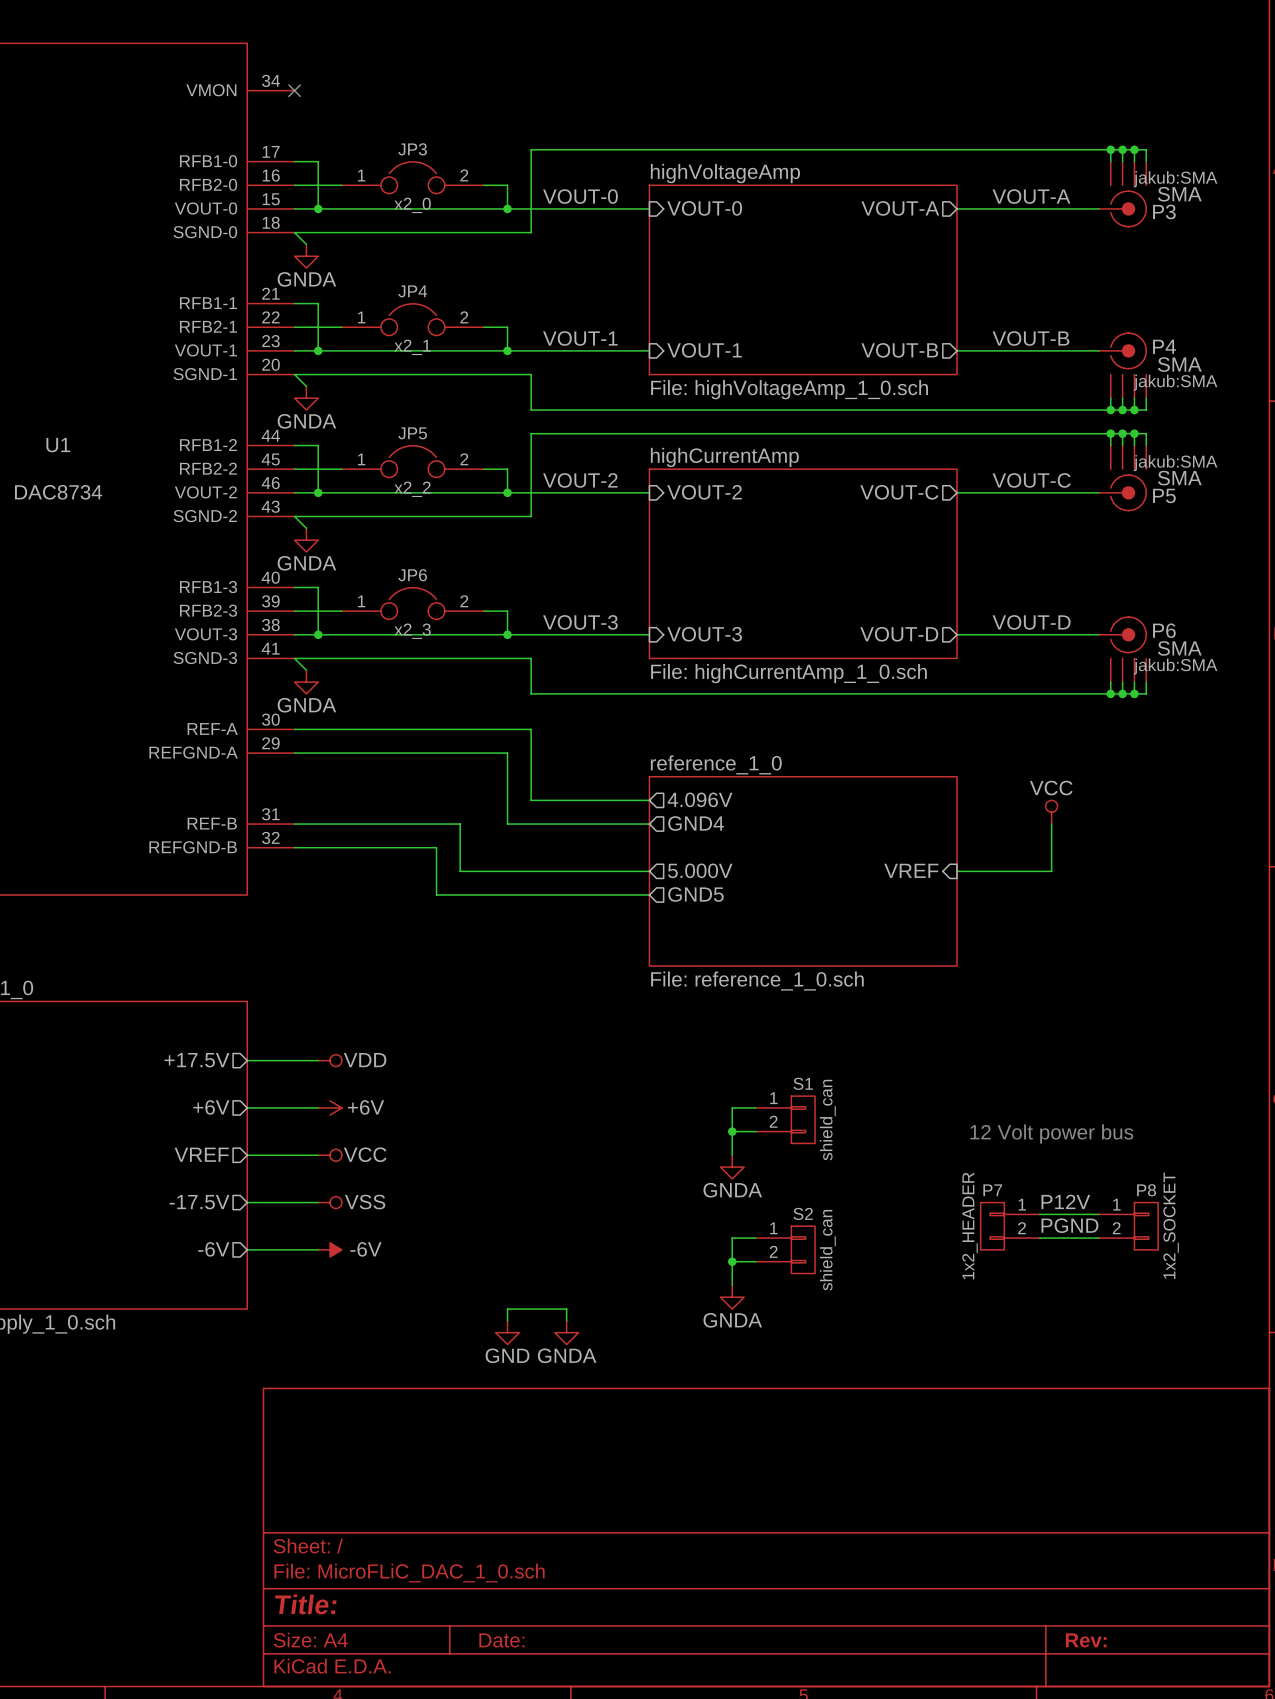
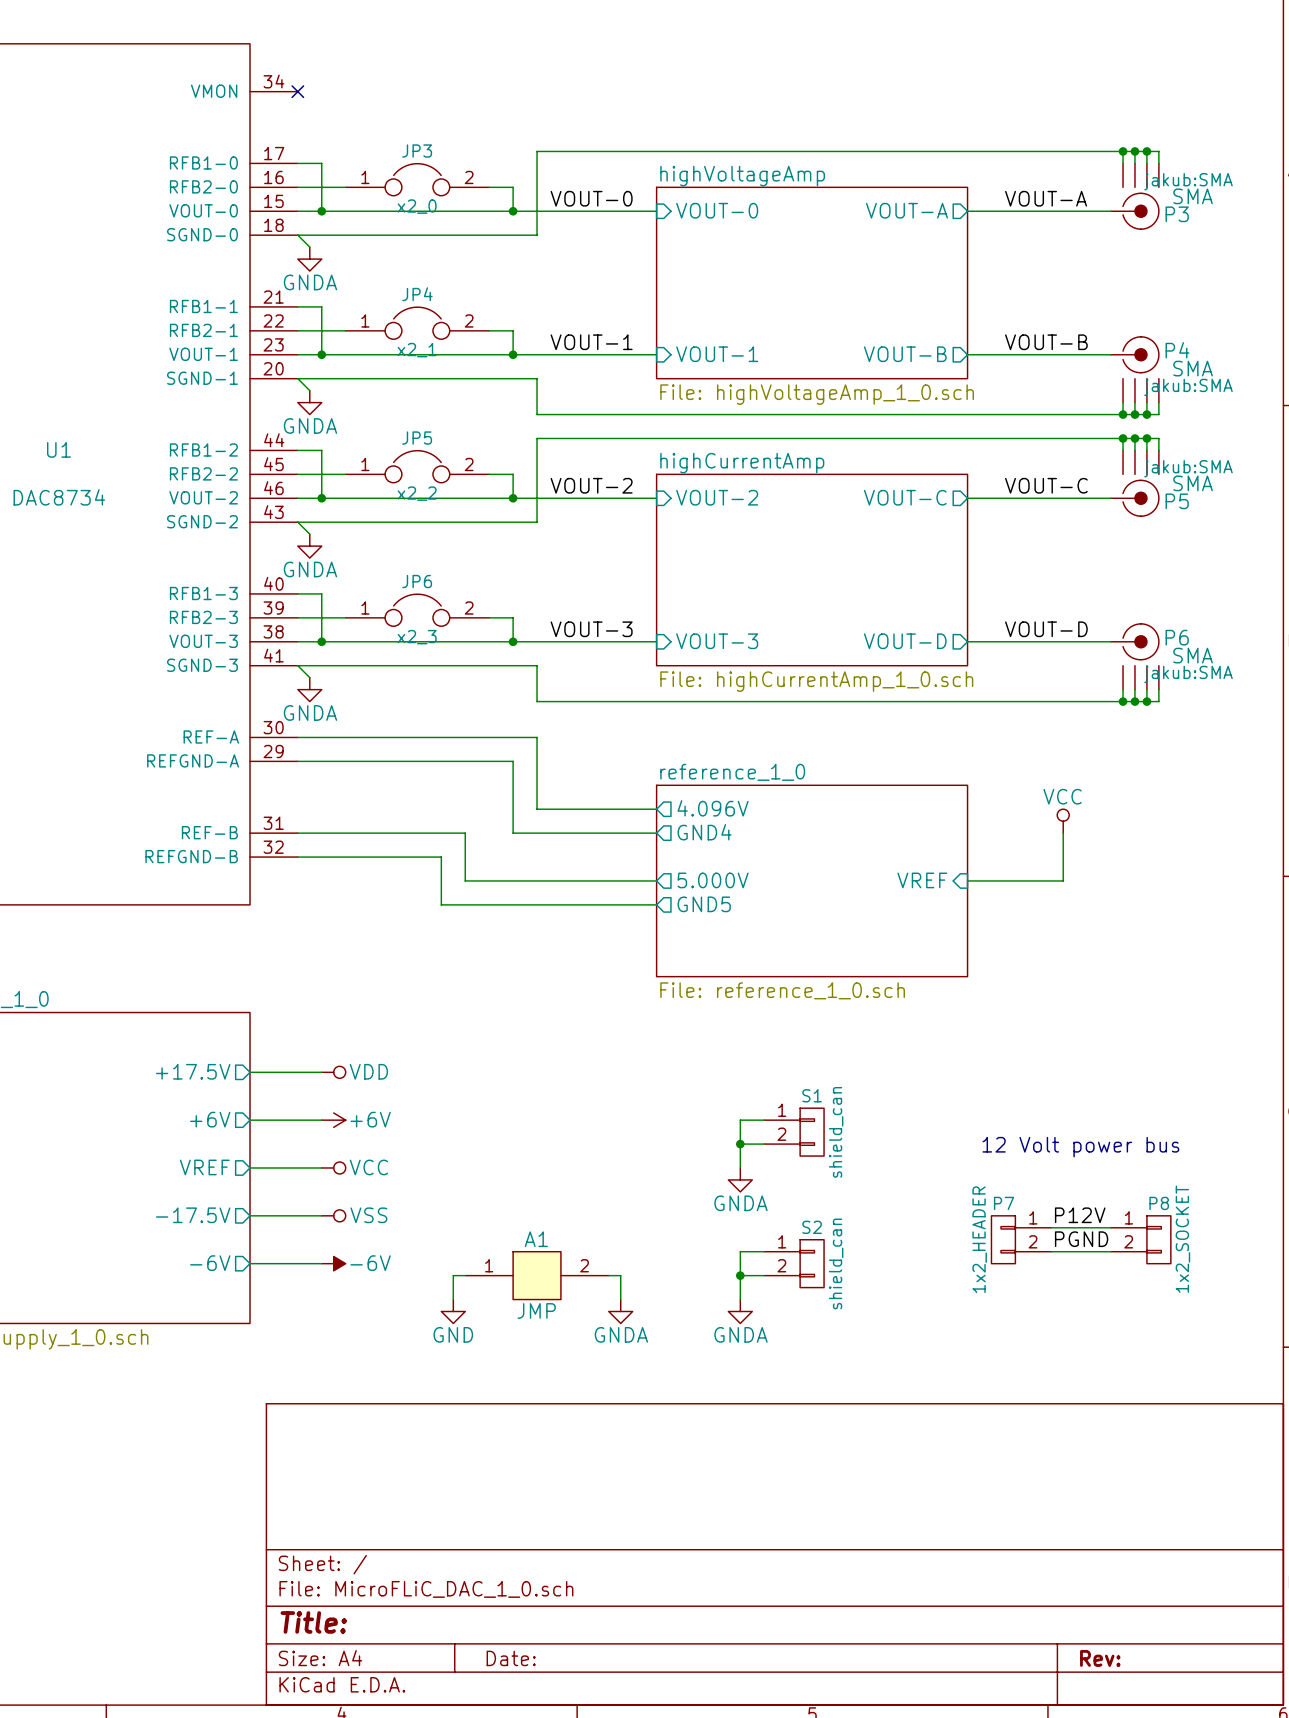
wire: none -> (465, 1275) (453, 1275) (453, 1299)
A1: none -> JMP (537, 1275)
wire: none -> (608, 1275) (620, 1275) (620, 1299)
wire: (507, 1320) (507, 1309) (566, 1309) (566, 1320) -> none
power symbol position: GND (507, 1332) -> GND (453, 1311)
power symbol position: GNDA (566, 1332) -> GNDA (620, 1311)

